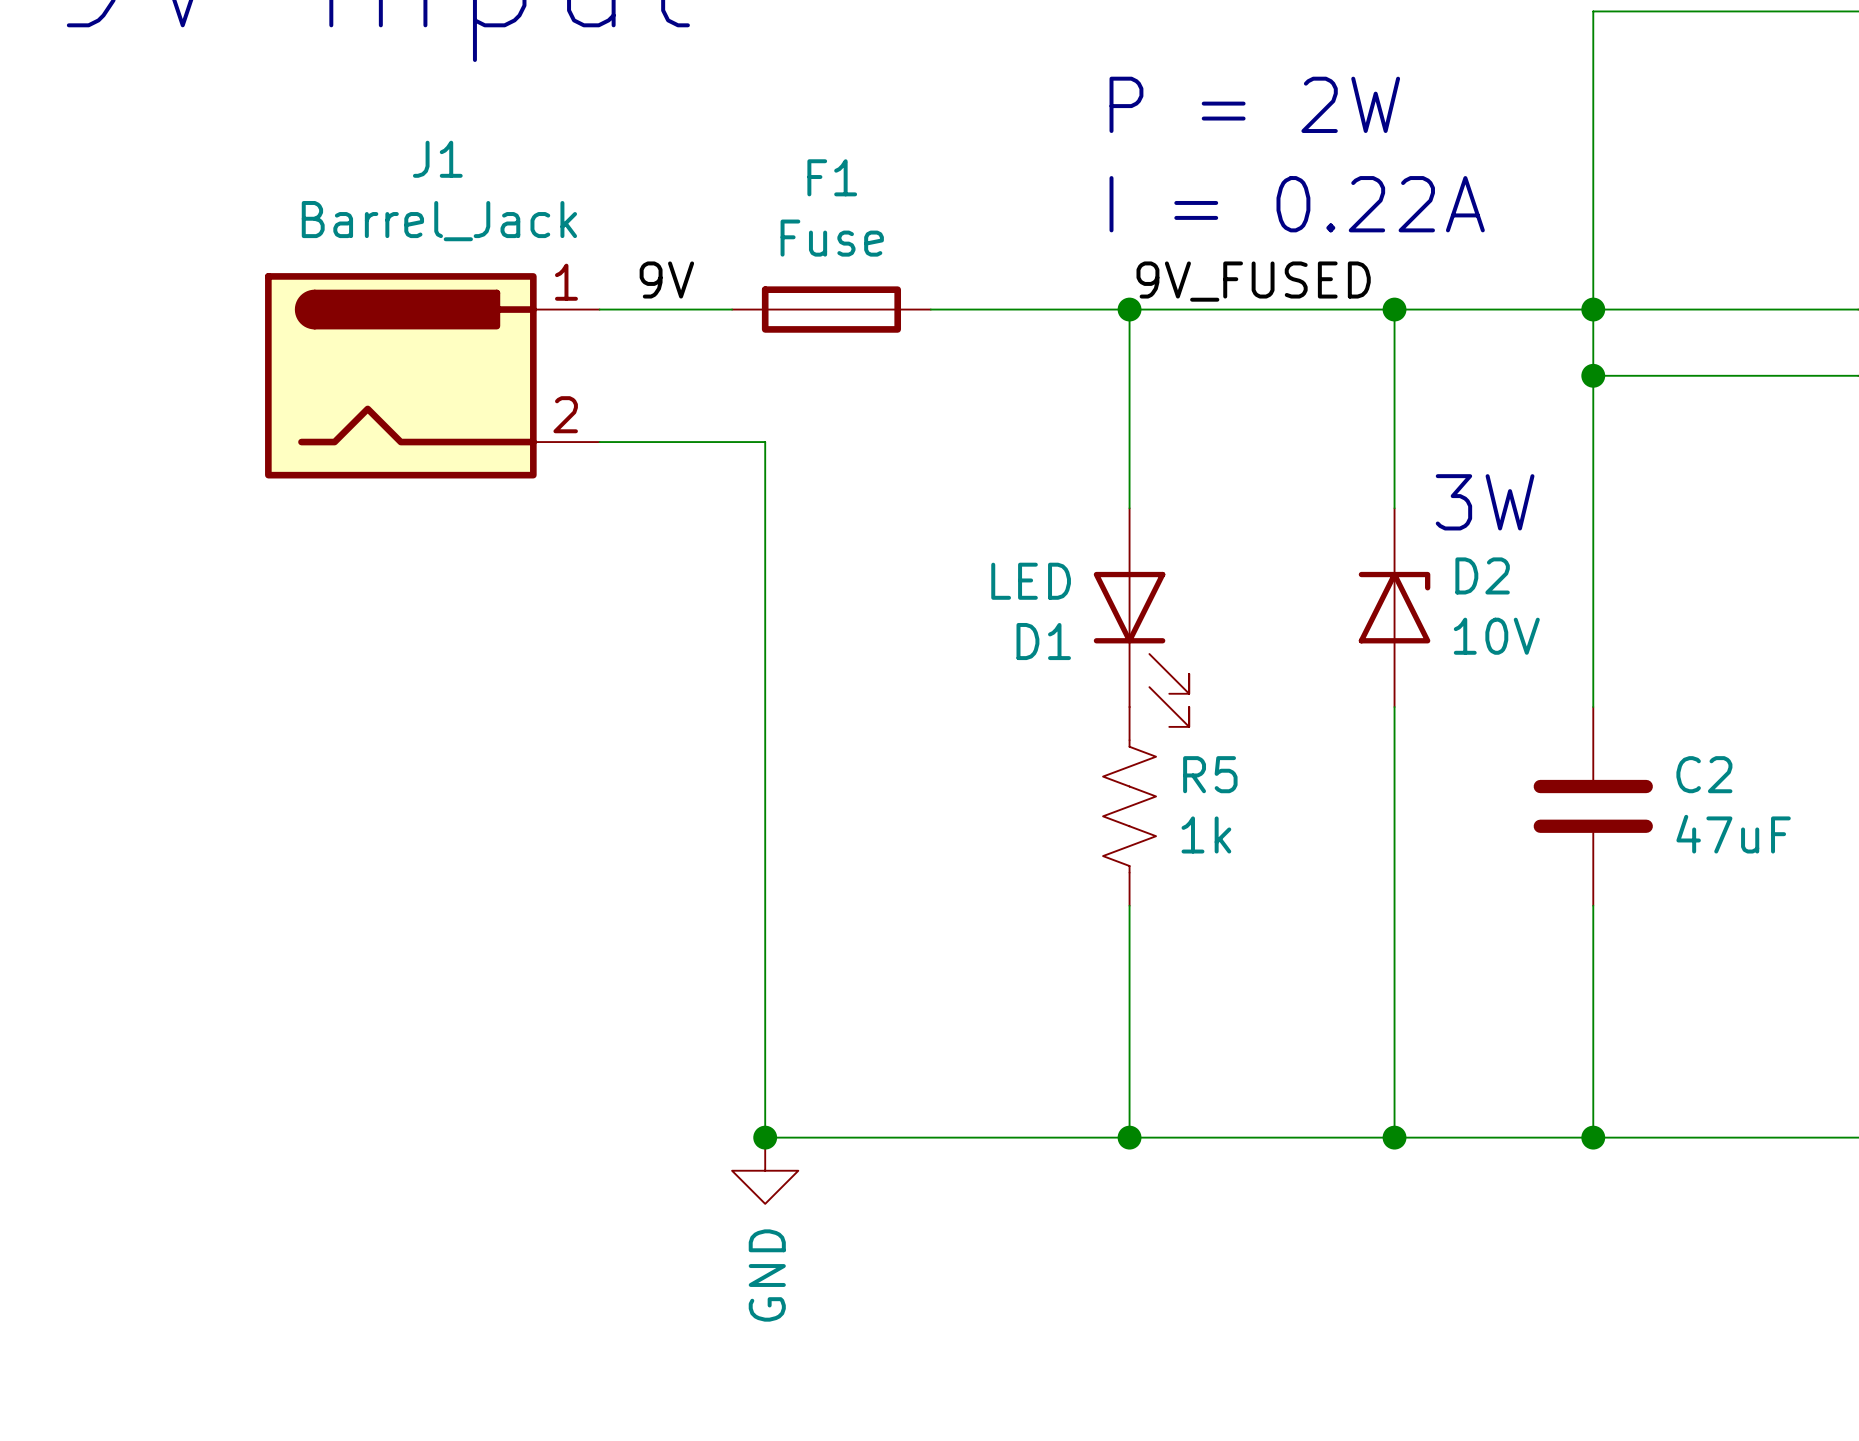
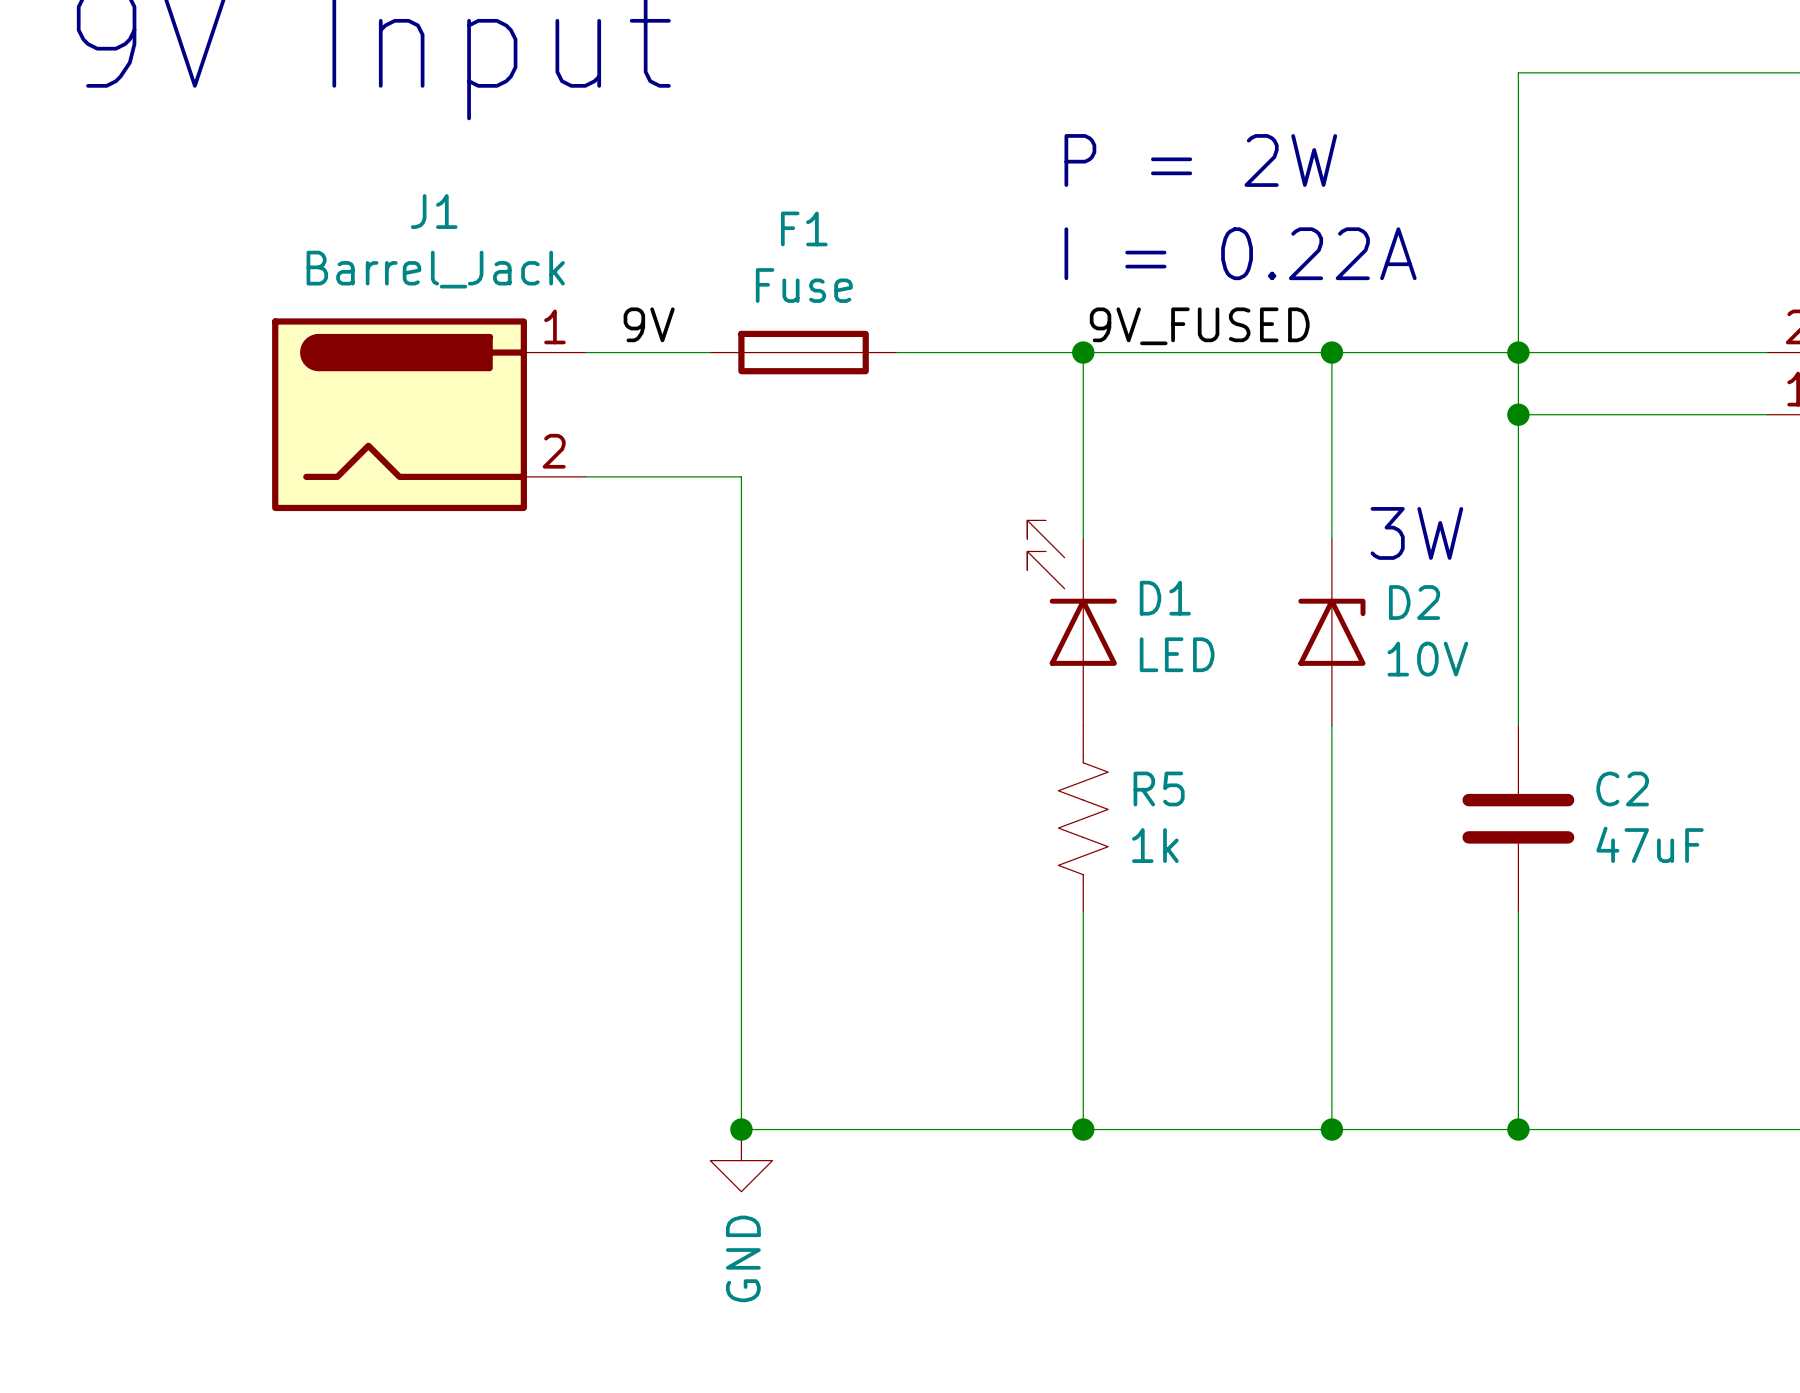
D1 rotation: 0° (1141, 649) -> 180° (1072, 593)

